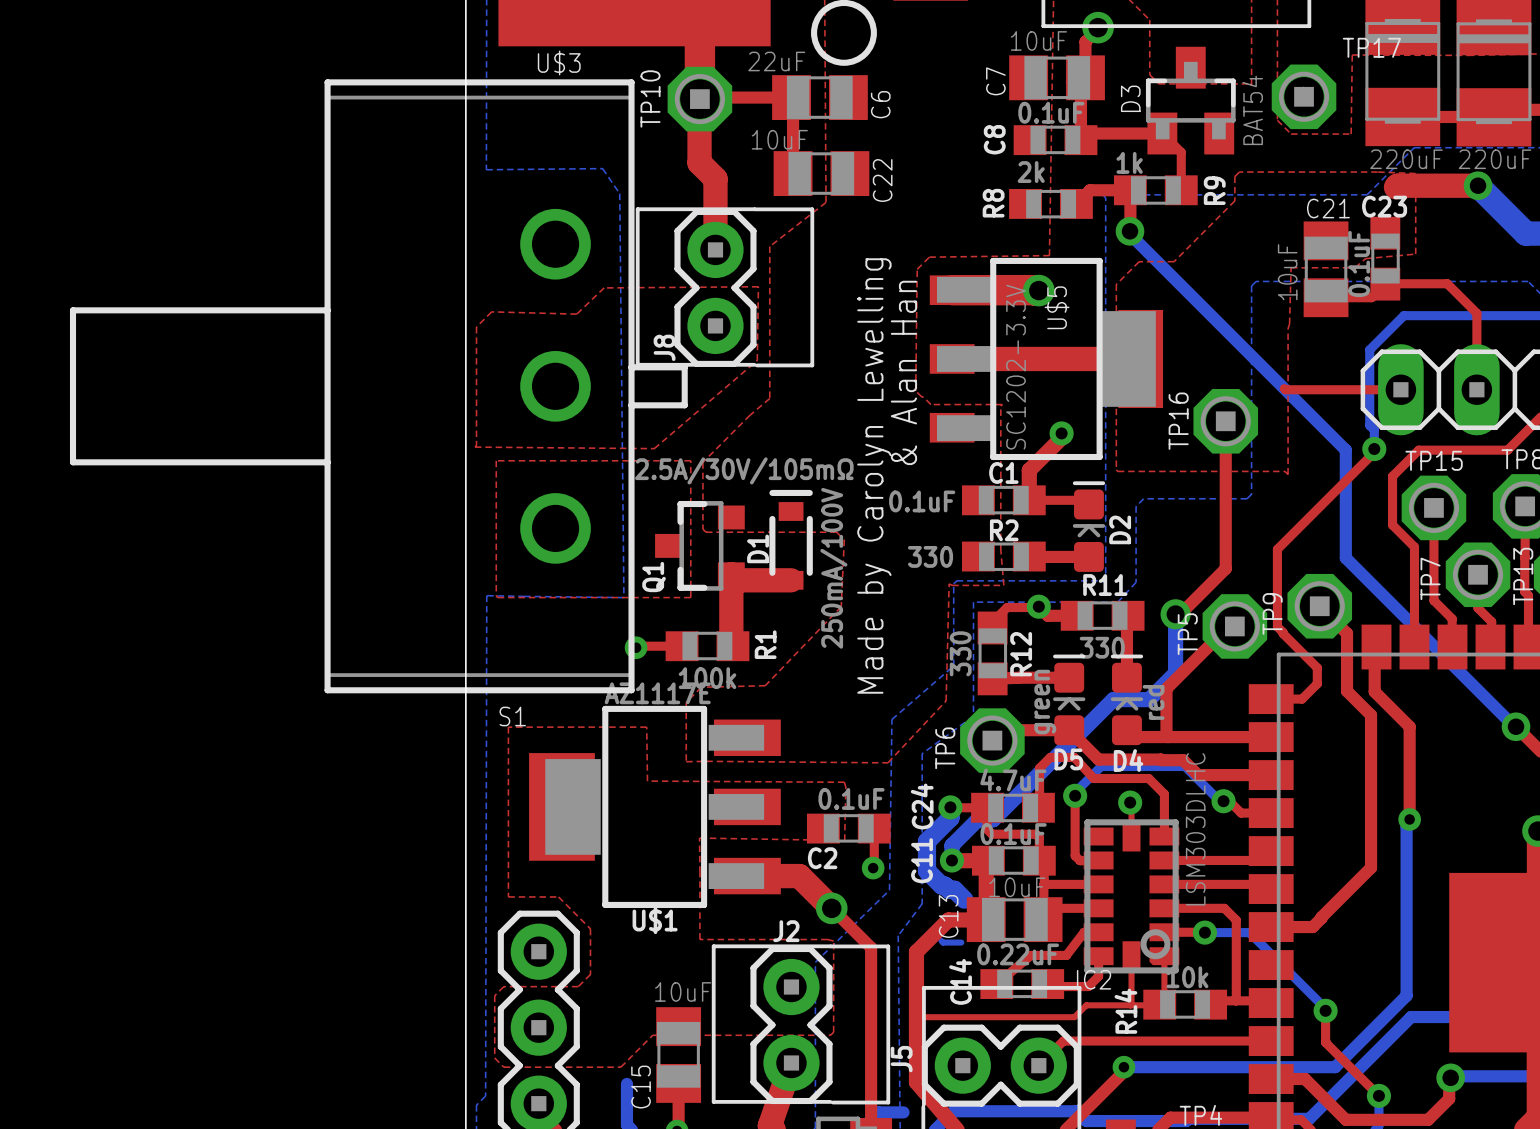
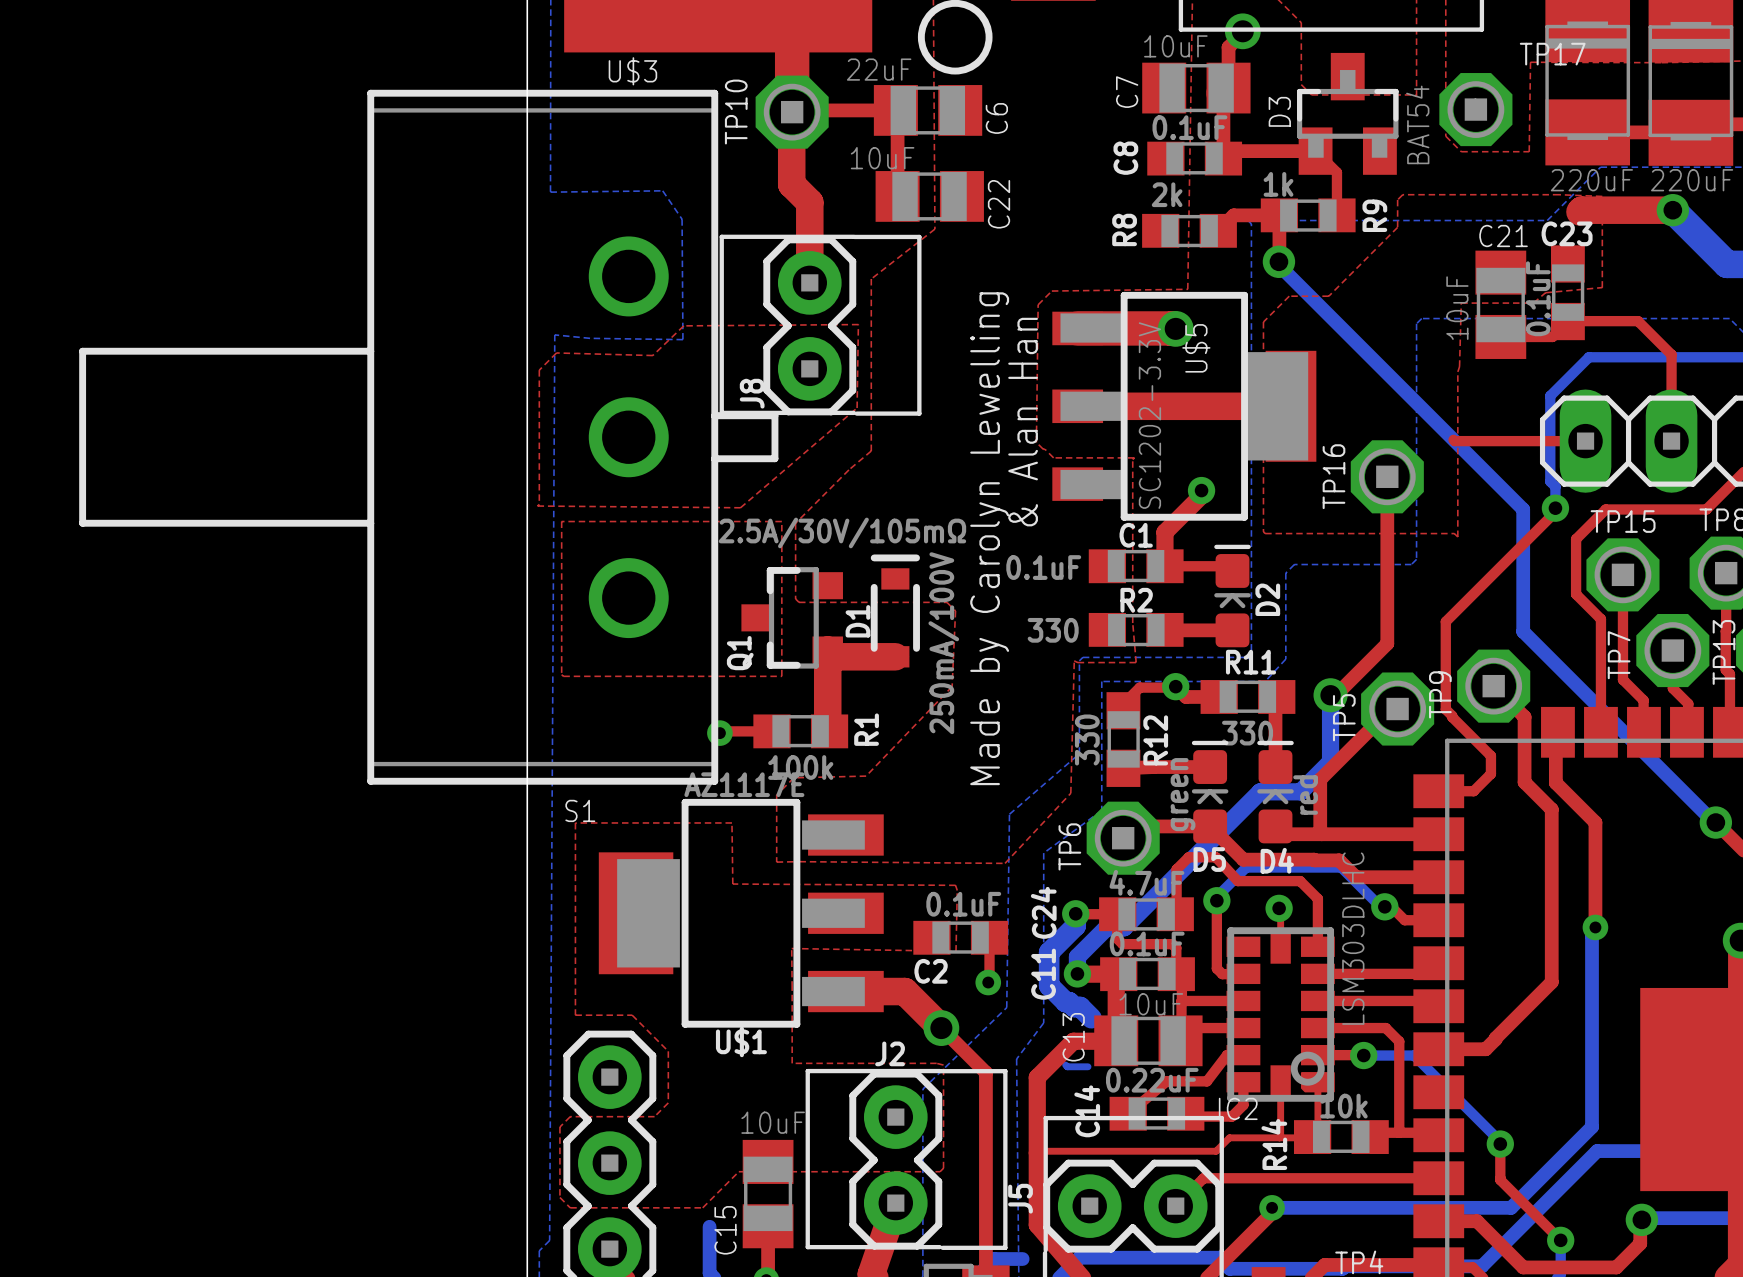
bottom zone outline: (486, 169) (602, 168) (619, 193) (623, 597) (486, 595) (485, 1096) -> (550, 192) (662, 190) (682, 219) (682, 339) (590, 338) (554, 334) (549, 1240)

